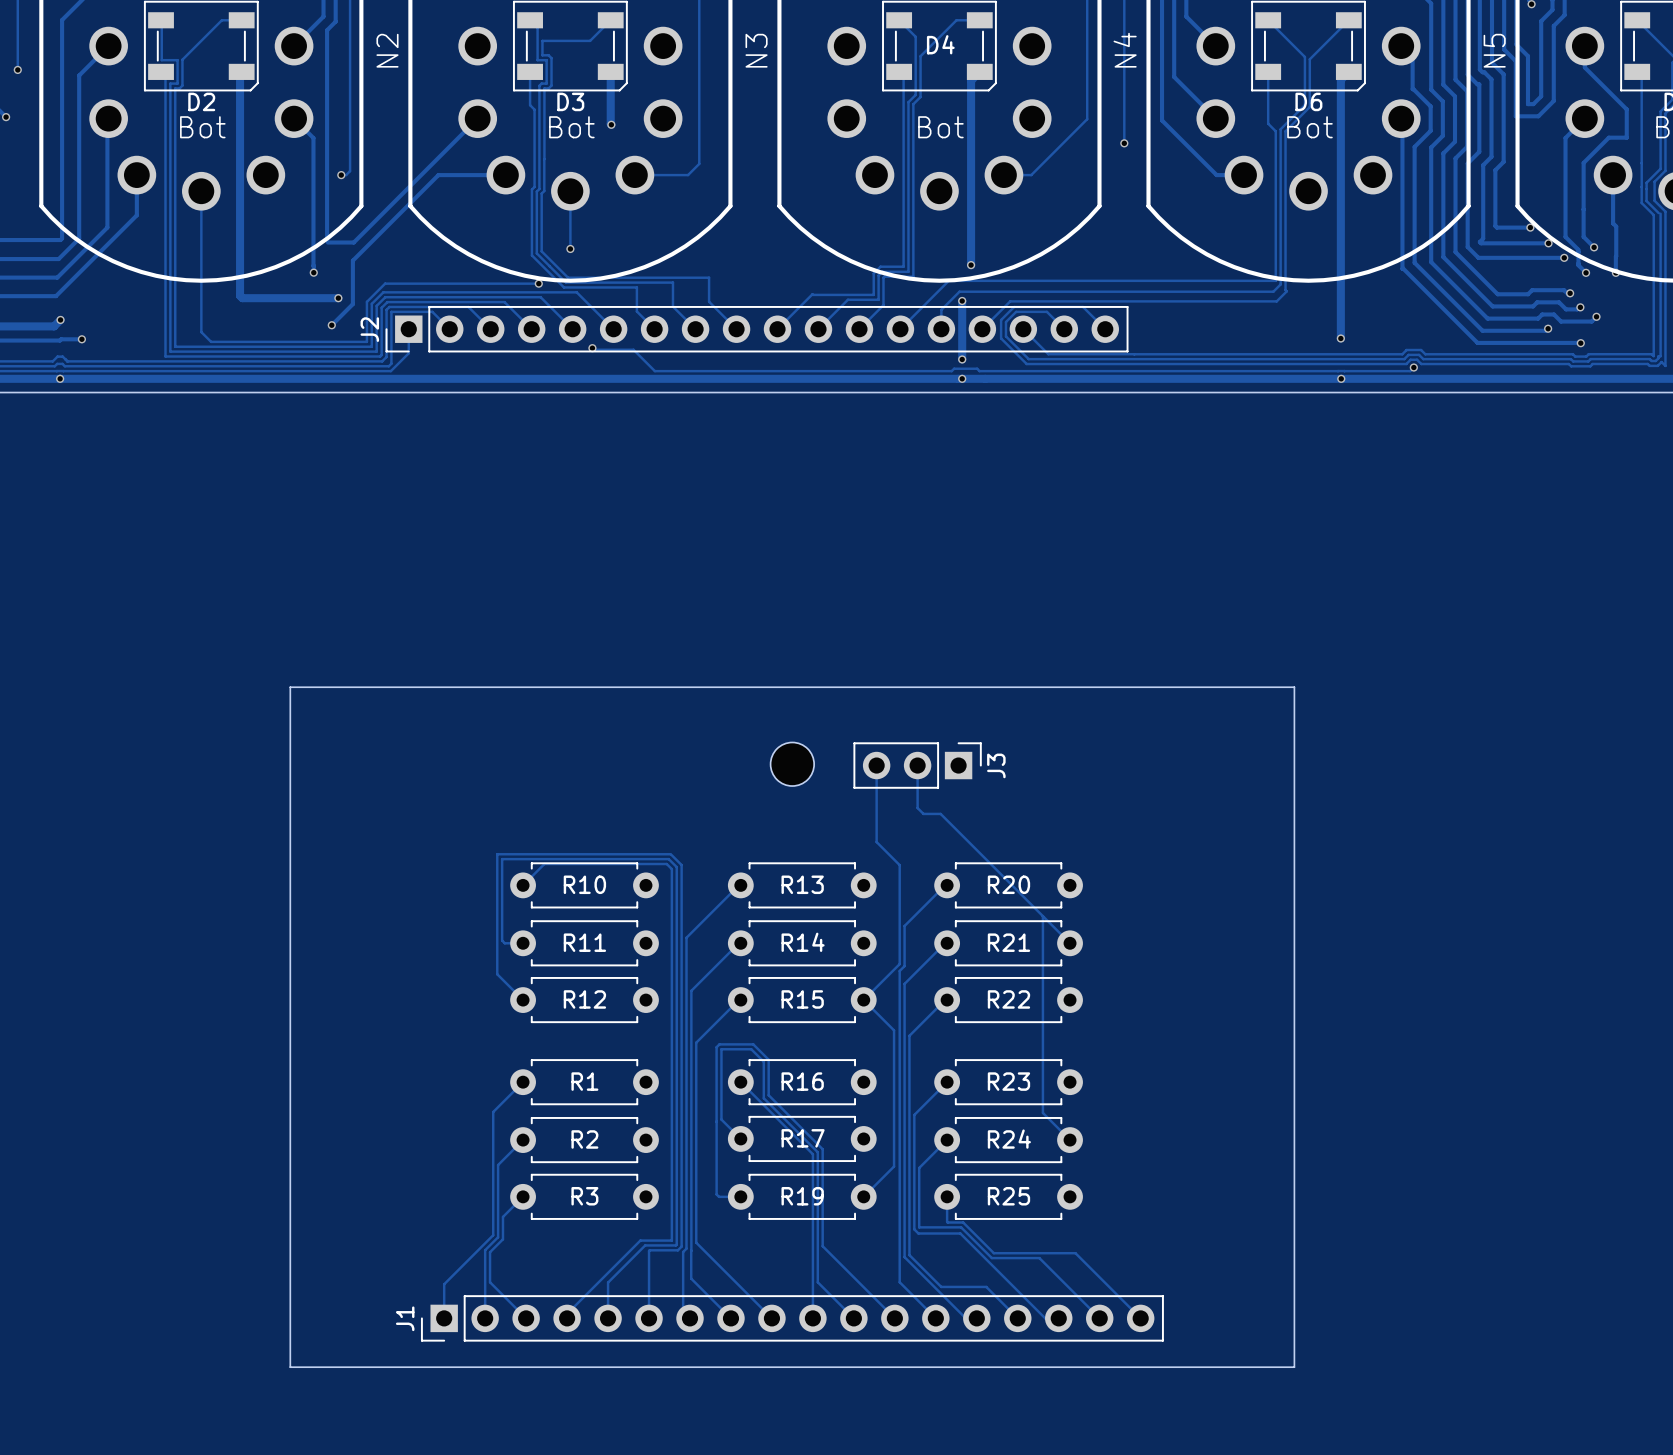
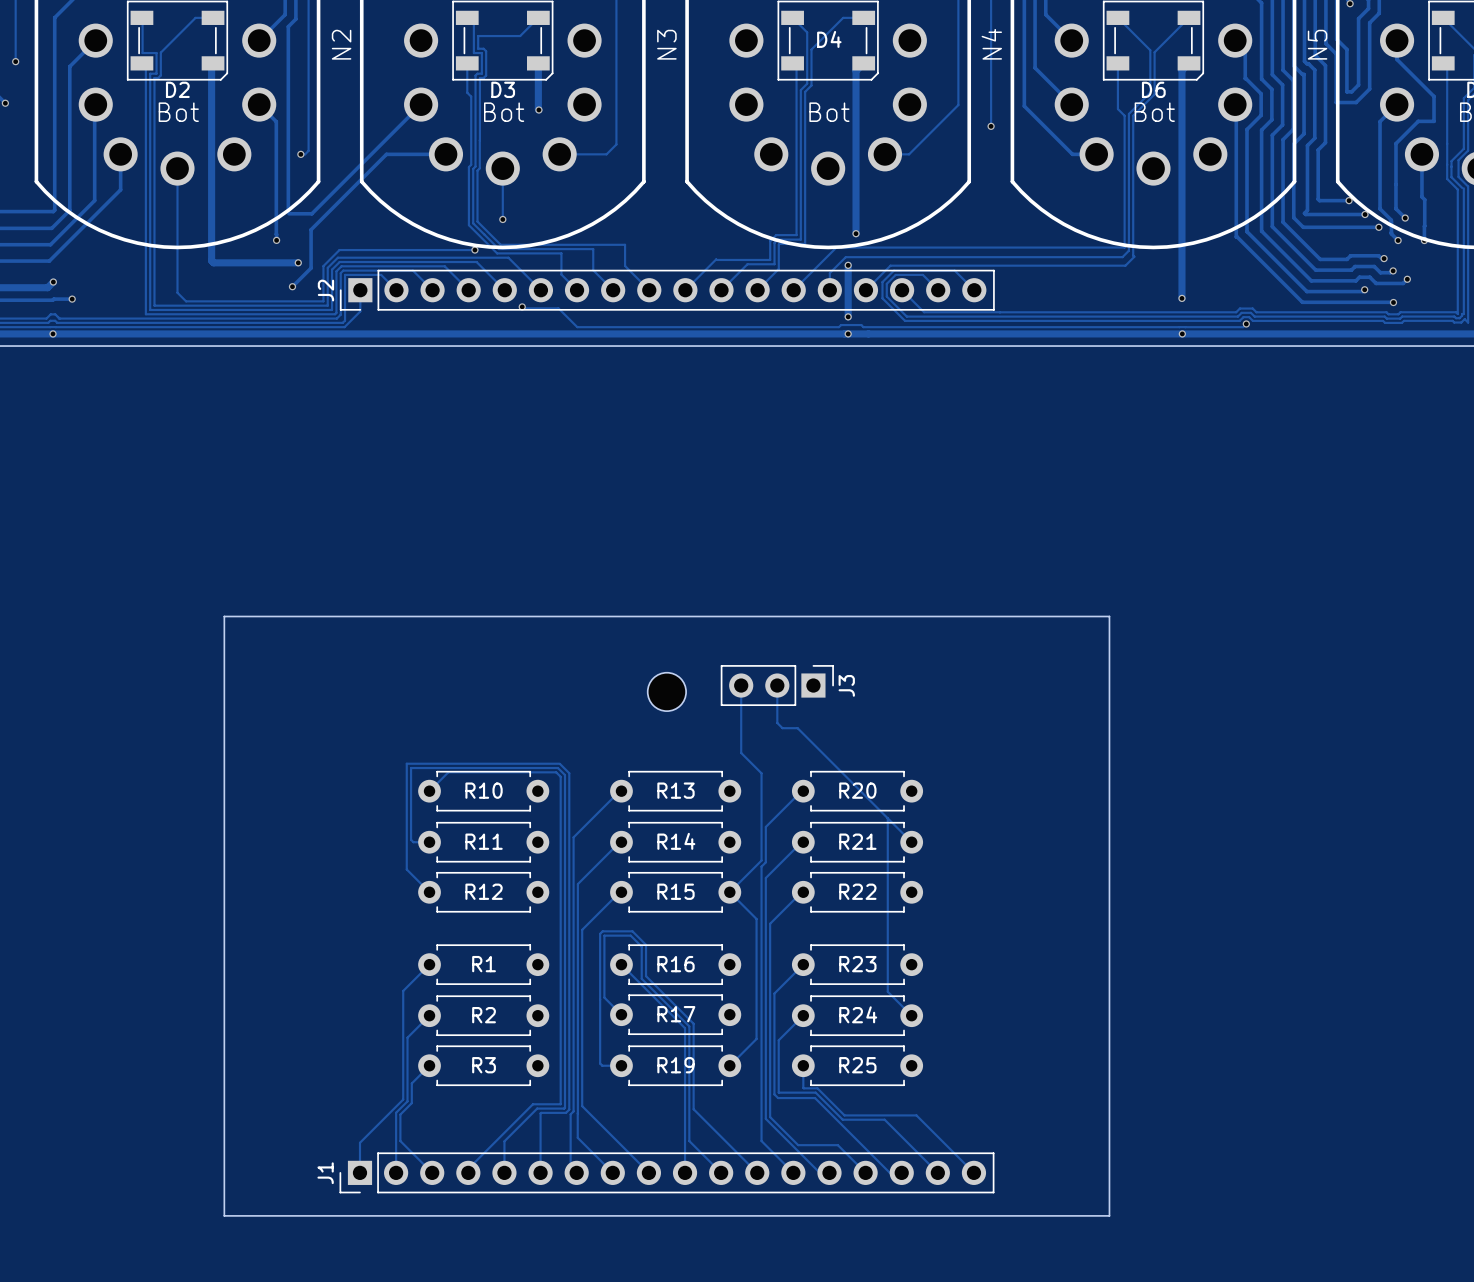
board edge: (290, 687) (1294, 687) (1294, 1367) (290, 1367) (290, 687) -> (224, 616) (1109, 616) (1109, 1215) (224, 1215) (224, 616)
part position: (792, 764) -> (666, 691)
track: (876, 765) (876, 842) (899, 865) (899, 964) (863, 1000) (894, 1030) (894, 1166) (863, 1196) -> (741, 685) (741, 753) (761, 773) (761, 860) (729, 892) (756, 919) (756, 1039) (729, 1065)
track: (917, 765) (917, 808) (923, 813) (940, 813) (1070, 943) -> (777, 685) (777, 723) (782, 728) (797, 728) (911, 842)
J3 position: (917, 765) -> (777, 685)
track: (670, 854) (497, 854) (497, 974) (523, 1000) -> (559, 763) (406, 763) (406, 869) (429, 892)
track: (671, 854) (681, 865) (681, 1246) (677, 1250) (649, 1250) (649, 1318) -> (560, 764) (569, 773) (569, 1109) (566, 1112) (540, 1113) (540, 1172)
track: (740, 883) (686, 937) (686, 1248) (683, 1251) (683, 1311) (690, 1318) -> (621, 789) (573, 837) (573, 1111) (570, 1114) (570, 1166) (576, 1172)
track: (947, 883) (904, 925) (904, 966) (899, 971) (899, 1282) (935, 1318) -> (803, 789) (765, 826) (765, 862) (761, 866) (761, 1141) (793, 1172)
track: (523, 885) (544, 864) (666, 864) (671, 869) (671, 1240) (640, 1240) (567, 1313) (567, 1318) -> (429, 791) (448, 772) (556, 772) (560, 776) (560, 1104) (532, 1104) (468, 1168) (468, 1172)
R10 position: (584, 885) -> (483, 791)
R13 position: (802, 885) -> (675, 791)
R20 position: (1008, 885) -> (857, 791)
track: (1042, 916) (1042, 1112) (1070, 1140) -> (887, 818) (887, 991) (911, 1015)
track: (740, 941) (691, 990) (691, 1250) -> (621, 840) (577, 884) (577, 1113)
track: (947, 941) (904, 983) (904, 1257) (965, 1318) (976, 1318) -> (803, 840) (765, 878) (765, 1118) (819, 1172) (829, 1172)
track: (523, 943) (504, 943) (502, 940) (502, 859) (668, 859) (676, 867) (676, 1244) (645, 1245) (608, 1282) (608, 1318) -> (429, 842) (413, 842) (411, 839) (411, 768) (557, 768) (564, 775) (564, 1107) (537, 1108) (504, 1141) (504, 1172)
R11 position: (584, 943) -> (483, 842)
R14 position: (802, 943) -> (675, 842)
R21 position: (1008, 943) -> (857, 842)
track: (740, 998) (696, 1042) (696, 1242) (771, 1318) -> (621, 890) (582, 929) (582, 1106) (648, 1172)
track: (947, 998) (909, 1035) (909, 1255) (941, 1286) (986, 1286) (1017, 1318) -> (803, 890) (770, 923) (770, 1117) (798, 1145) (837, 1145) (865, 1172)
R12 position: (584, 1000) -> (483, 892)
R15 position: (802, 1000) -> (675, 892)
R22 position: (1008, 1000) -> (857, 892)
track: (523, 1082) (493, 1112) (493, 1235) (444, 1284) (444, 1318) -> (429, 964) (403, 990) (403, 1099) (359, 1142) (359, 1172)
R1 position: (584, 1082) -> (483, 964)
track: (740, 1082) (812, 1154) (812, 1318) -> (621, 964) (685, 1028) (685, 1172)
R16 position: (802, 1082) -> (675, 964)
track: (947, 1082) (914, 1114) (914, 1229) (918, 1233) (960, 1233) (1045, 1318) (1058, 1318) -> (803, 964) (774, 993) (774, 1094) (778, 1098) (815, 1098) (889, 1172) (901, 1172)
R23 position: (1008, 1082) -> (857, 964)
track: (740, 1138) (721, 1119) (721, 1049) (751, 1049) (763, 1061) (763, 1098) (817, 1152) (817, 1282) (853, 1318) -> (621, 1014) (604, 997) (604, 935) (630, 935) (641, 946) (641, 978) (689, 1026) (689, 1141) (721, 1172)
R17 position: (802, 1138) -> (675, 1014)
track: (523, 1140) (498, 1165) (498, 1237) (485, 1250) (485, 1318) -> (429, 1015) (407, 1037) (407, 1101) (396, 1112) (396, 1172)
R2 position: (584, 1140) -> (483, 1015)
track: (947, 1140) (919, 1167) (919, 1227) (961, 1227) (991, 1258) (1039, 1258) (1099, 1318) -> (803, 1015) (778, 1040) (778, 1092) (815, 1092) (842, 1119) (884, 1119) (937, 1172)
R24 position: (1008, 1140) -> (857, 1015)
track: (523, 1196) (502, 1216) (502, 1239) (490, 1252) (490, 1282) (526, 1318) -> (429, 1065) (411, 1083) (411, 1103) (400, 1114) (400, 1141) (432, 1172)
R3 position: (584, 1196) -> (483, 1065)
track: (740, 1196) (719, 1196) (716, 1194) (716, 1047) (719, 1044) (753, 1044) (768, 1059) (768, 1095) (822, 1149) (822, 1246) (894, 1318) -> (621, 1065) (602, 1065) (600, 1063) (600, 933) (602, 931) (632, 931) (646, 944) (646, 976) (693, 1023) (693, 1109) (757, 1172)
R19 position: (802, 1196) -> (675, 1065)
track: (947, 1196) (947, 1221) (963, 1222) (993, 1253) (1075, 1253) (1140, 1318) -> (803, 1065) (803, 1087) (817, 1088) (844, 1115) (916, 1115) (973, 1172)
R25 position: (1008, 1196) -> (857, 1065)
track: (691, 1250) (691, 1278) (730, 1318) -> (577, 1113) (577, 1137) (612, 1172)
J1 position: (792, 1318) -> (666, 1172)

